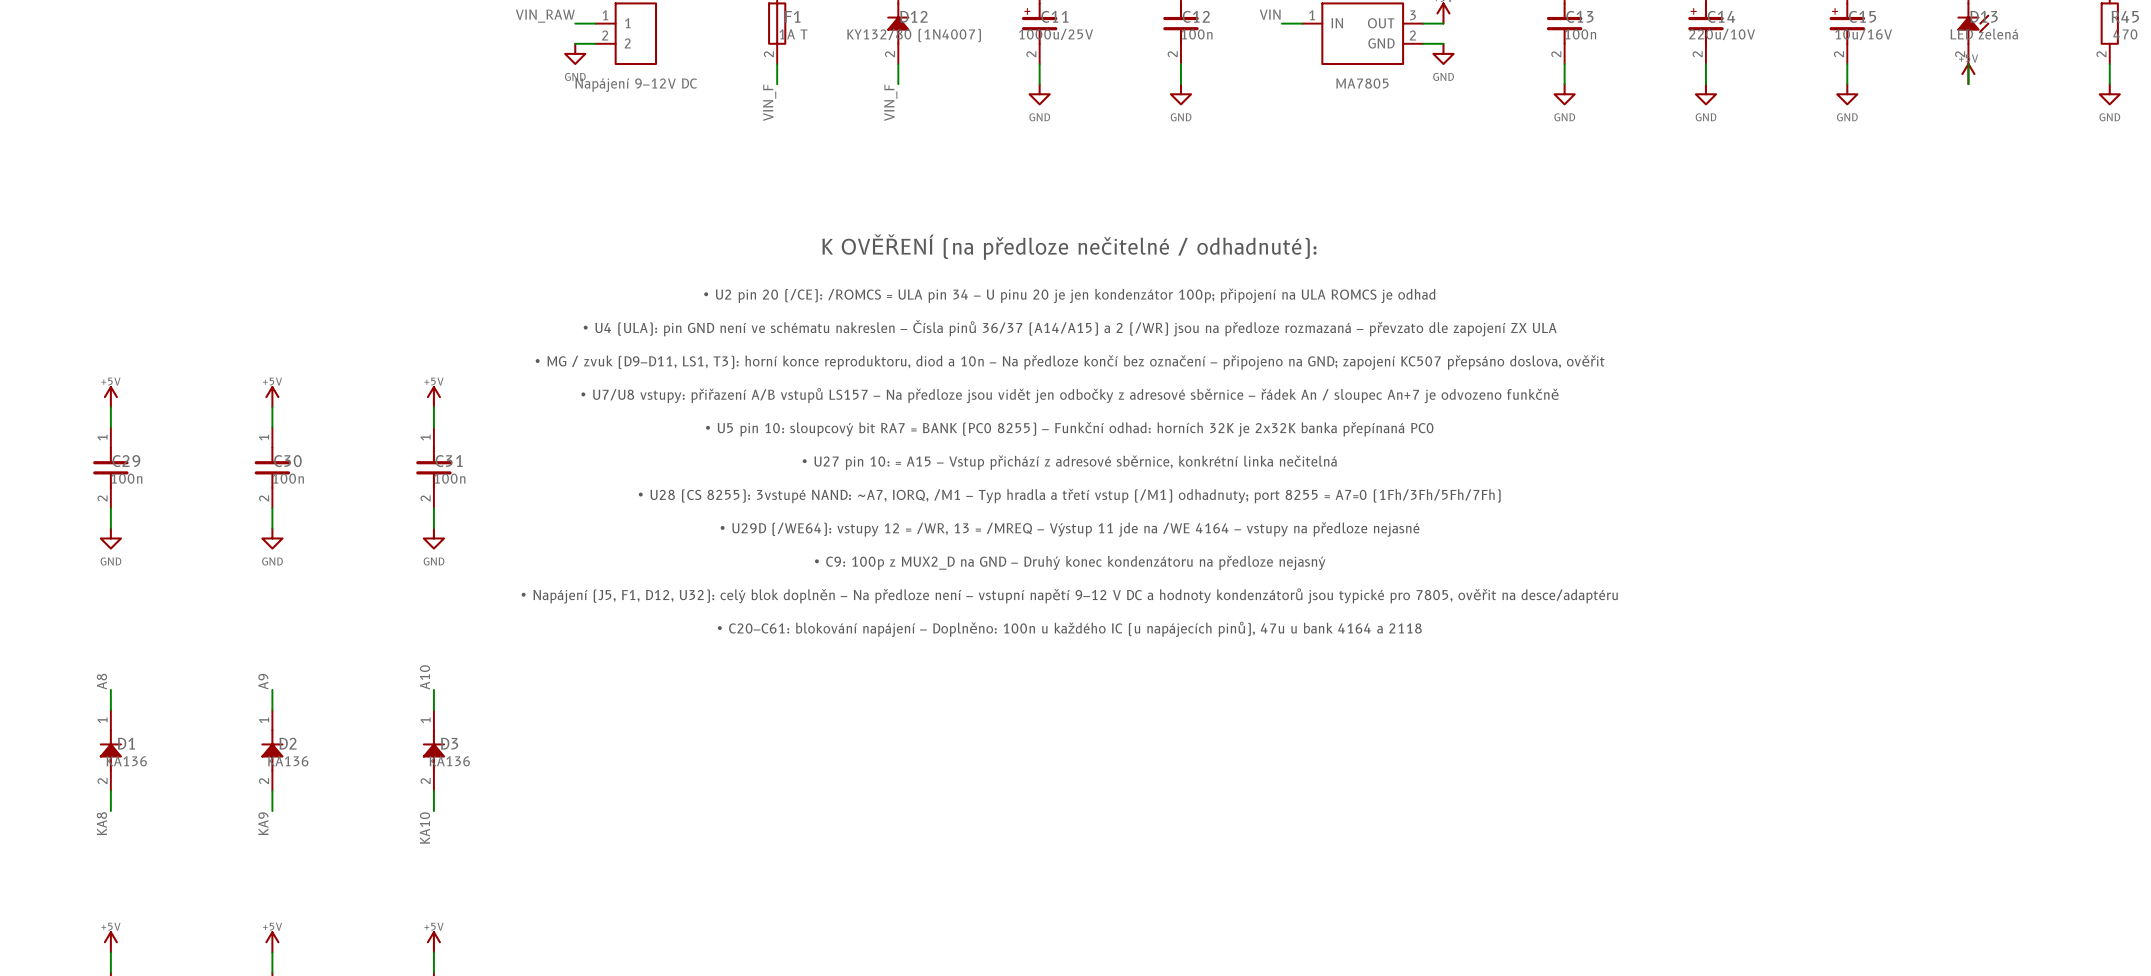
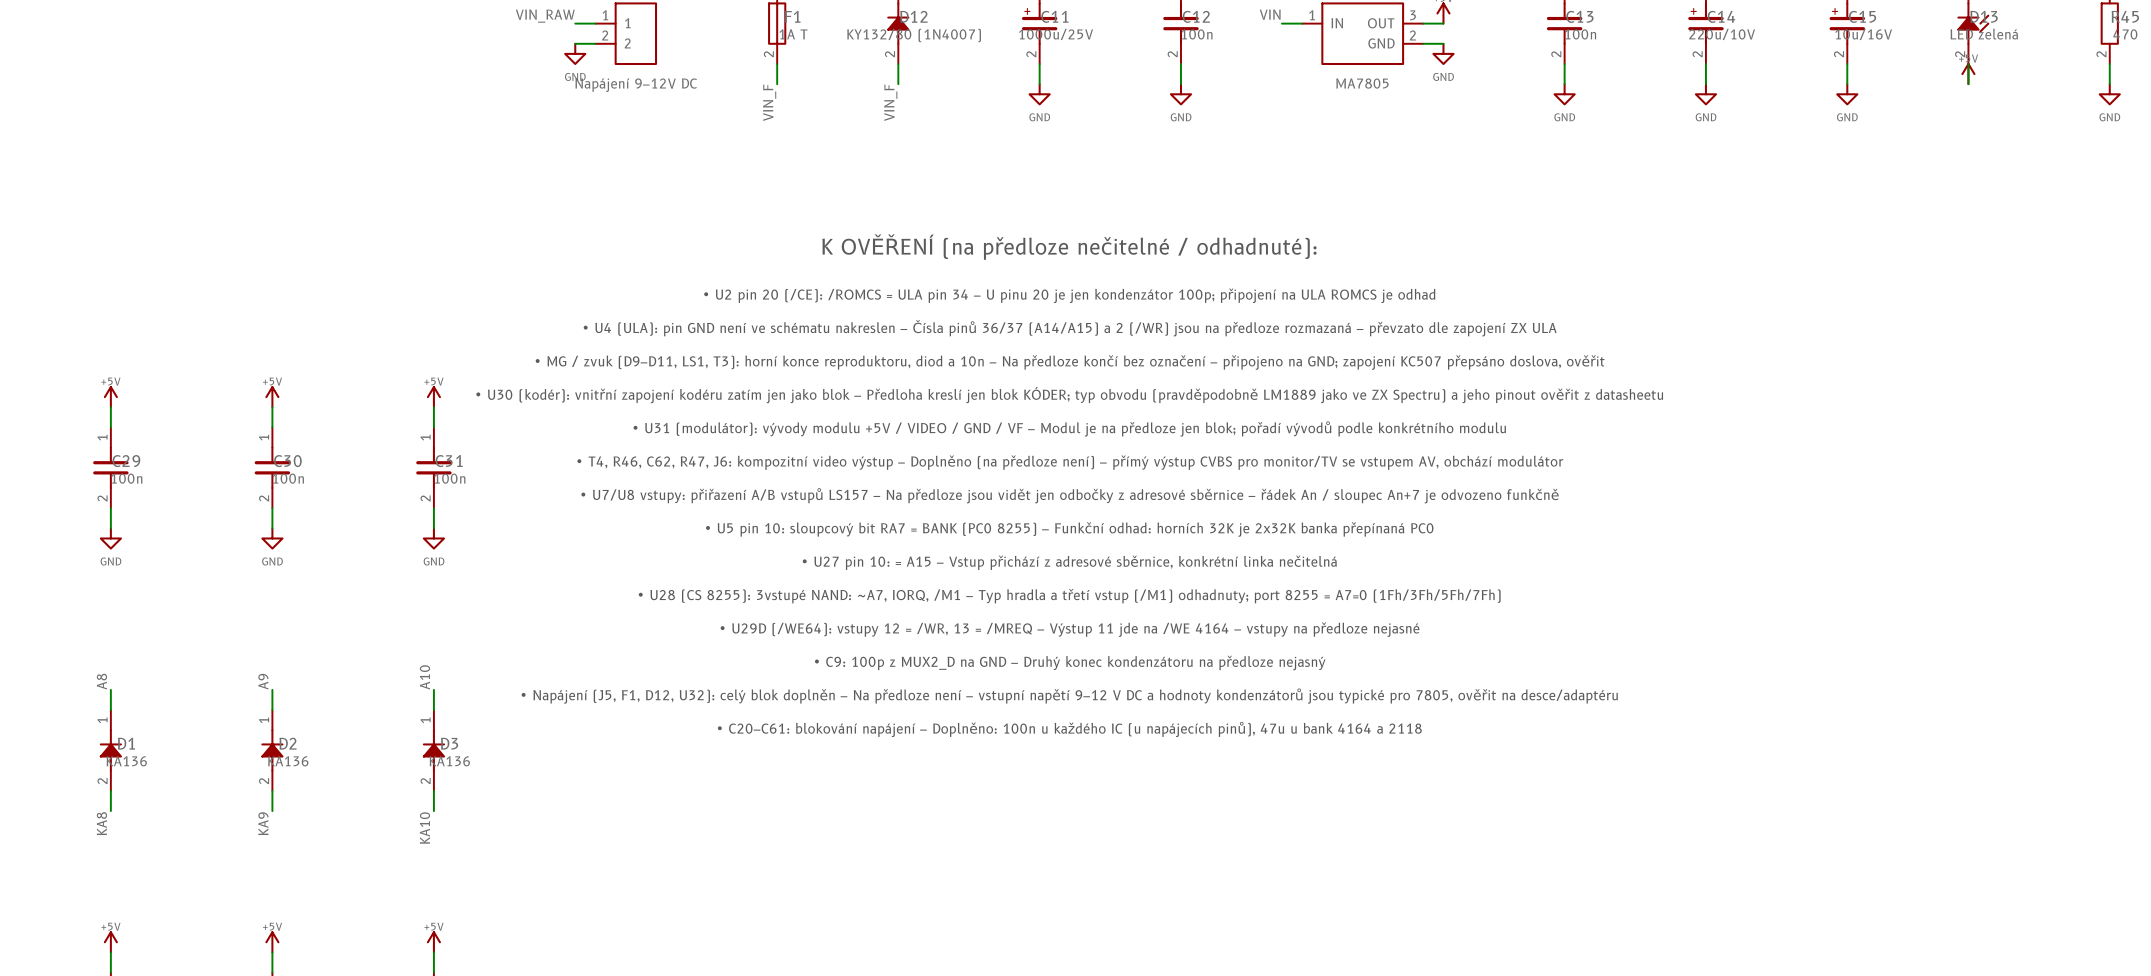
text: • U7/U8 vstupy: přiřazení A/B vstupů LS157 – Na předloze jsou vidět jen odbočky z adresové sběrnice – řádek An / sloupec An+7 je odvozeno funkčně (1070, 395) -> • U30 (kodér): vnitřní zapojení kodéru zatím jen jako blok – Předloha kreslí jen blok KÓDER; typ obvodu (pravděpodobně LM1889 jako ve ZX Spectru) a jeho pinout ověřit z datasheetu (1069, 395)
text: • U5 pin 10: sloupcový bit RA7 = BANK (PC0 8255) – Funkční odhad: horních 32K je 2x32K banka přepínaná PC0 (1069, 429) -> • U31 (modulátor): vývody modulu +5V / VIDEO / GND / VF – Modul je na předloze jen blok; pořadí vývodů podle konkrétního modulu (1069, 428)
text: • U27 pin 10: = A15 – Vstup přichází z adresové sběrnice, konkrétní linka nečitelná (1069, 462) -> • T4, R46, C62, R47, J6: kompozitní video výstup – Doplněno (na předloze není) – přímý výstup CVBS pro monitor/TV se vstupem AV, obchází modulátor (1070, 462)
text: • U28 (CS 8255): 3vstupé NAND: ~A7, IORQ, /M1 – Typ hradla a třetí vstup (/M1) odhadnuty; port 8255 = A7=0 (1Fh/3Fh/5Fh/7Fh) (1069, 496) -> • U7/U8 vstupy: přiřazení A/B vstupů LS157 – Na předloze jsou vidět jen odbočky z adresové sběrnice – řádek An / sloupec An+7 je odvozeno funkčně (1070, 495)
text: • U29D (/WE64): vstupy 12 = /WR, 13 = /MREQ – Výstup 11 jde na /WE 4164 – vstupy na předloze nejasné (1070, 529) -> • U5 pin 10: sloupcový bit RA7 = BANK (PC0 8255) – Funkční odhad: horních 32K je 2x32K banka přepínaná PC0 (1069, 529)
text: • C9: 100p z MUX2_D na GND – Druhý konec kondenzátoru na předloze nejasný (1070, 562) -> • U27 pin 10: = A15 – Vstup přichází z adresové sběrnice, konkrétní linka nečitelná (1069, 562)
text: • Napájení (J5, F1, D12, U32): celý blok doplněn – Na předloze není – vstupní napětí 9–12 V DC a hodnoty kondenzátorů jsou typické pro 7805, ověřit na desce/adaptéru (1069, 595) -> • U28 (CS 8255): 3vstupé NAND: ~A7, IORQ, /M1 – Typ hradla a třetí vstup (/M1) odhadnuty; port 8255 = A7=0 (1Fh/3Fh/5Fh/7Fh) (1069, 596)
text: • C20–C61: blokování napájení – Doplněno: 100n u každého IC (u napájecích pinů), 47u u bank 4164 a 2118 (1069, 629) -> • U29D (/WE64): vstupy 12 = /WR, 13 = /MREQ – Výstup 11 jde na /WE 4164 – vstupy na předloze nejasné (1070, 629)
text: none -> • C9: 100p z MUX2_D na GND – Druhý konec kondenzátoru na předloze nejasný (1070, 663)
text: none -> • Napájení (J5, F1, D12, U32): celý blok doplněn – Na předloze není – vstupní napětí 9–12 V DC a hodnoty kondenzátorů jsou typické pro 7805, ověřit na desce/adaptéru (1069, 696)
text: none -> • C20–C61: blokování napájení – Doplněno: 100n u každého IC (u napájecích pinů), 47u u bank 4164 a 2118 (1069, 729)

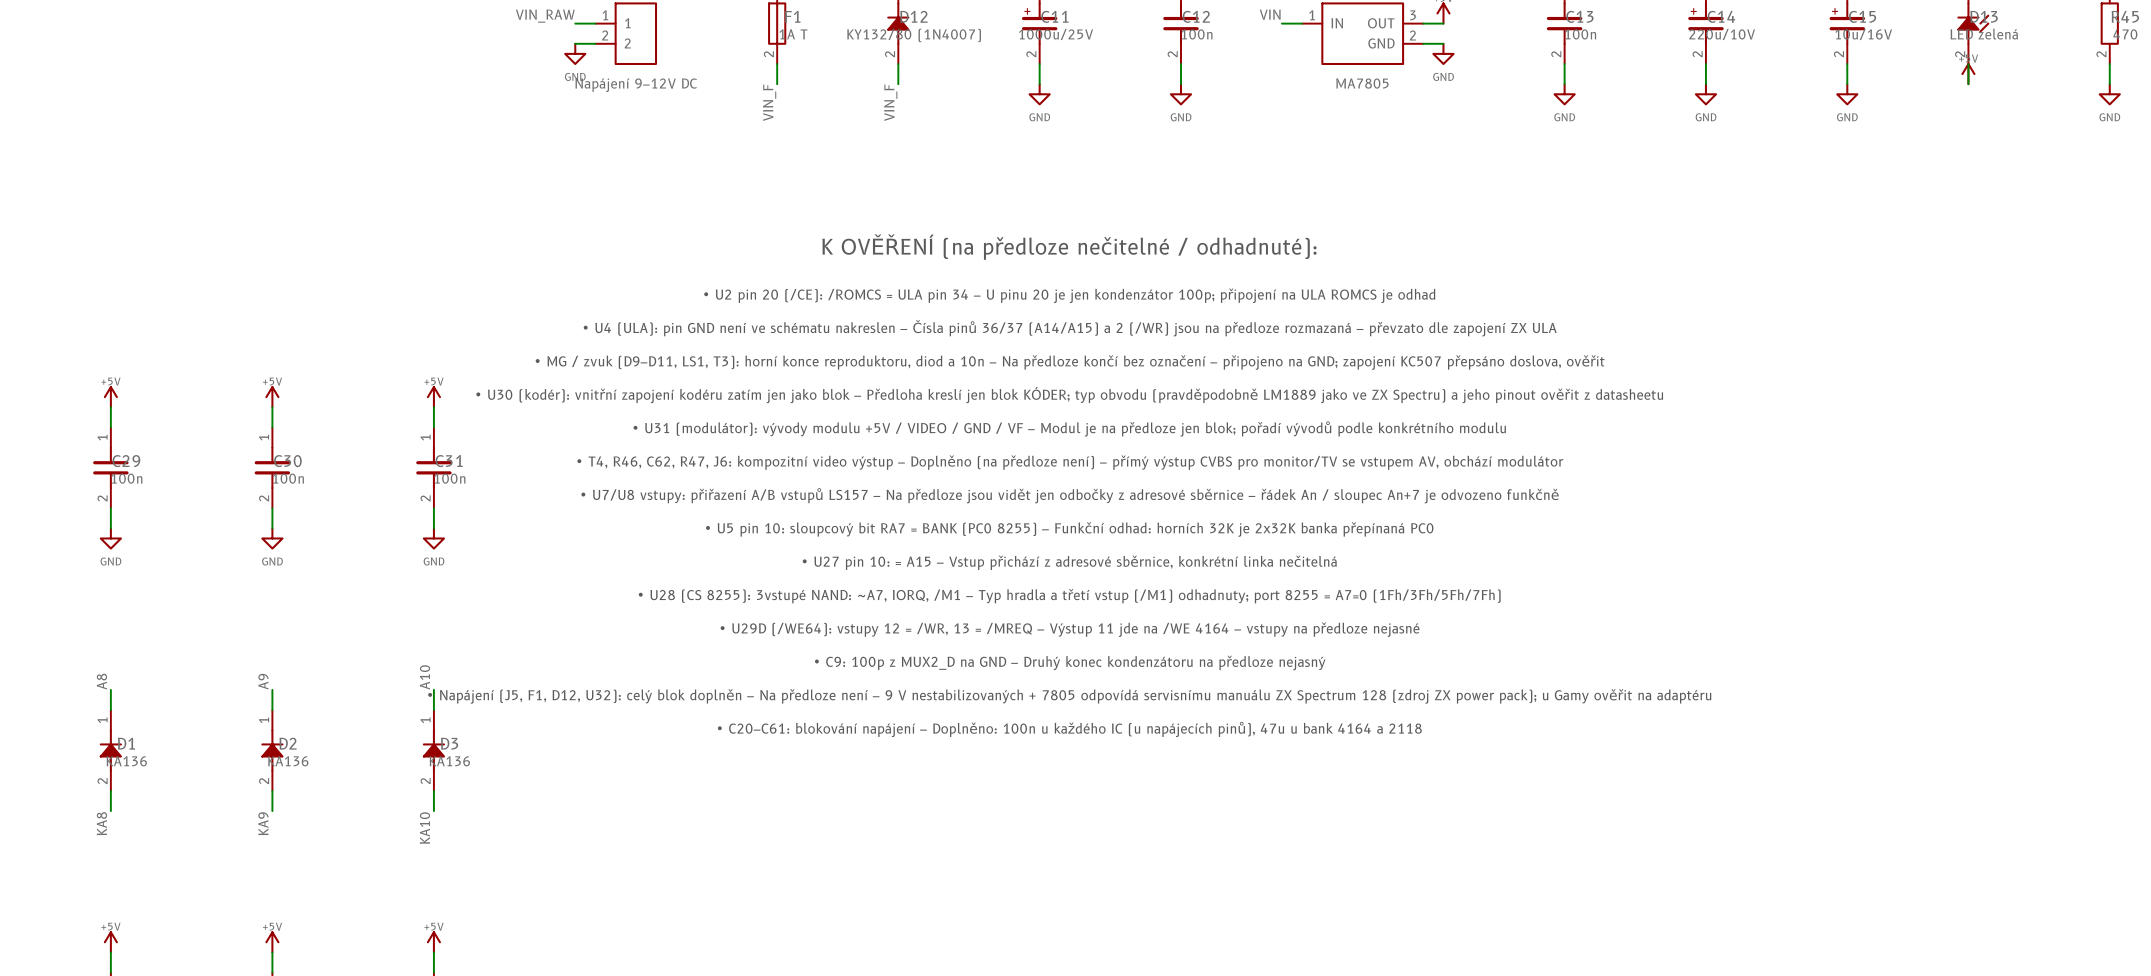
text: • Napájení (J5, F1, D12, U32): celý blok doplněn – Na předloze není – vstupní napětí 9–12 V DC a hodnoty kondenzátorů jsou typické pro 7805, ověřit na desce/adaptéru (1069, 696) -> • Napájení (J5, F1, D12, U32): celý blok doplněn – Na předloze není – 9 V nestabilizovaných + 7805 odpovídá servisnímu manuálu ZX Spectrum 128 (zdroj ZX power pack); u Gamy ověřit na adaptéru (1069, 696)

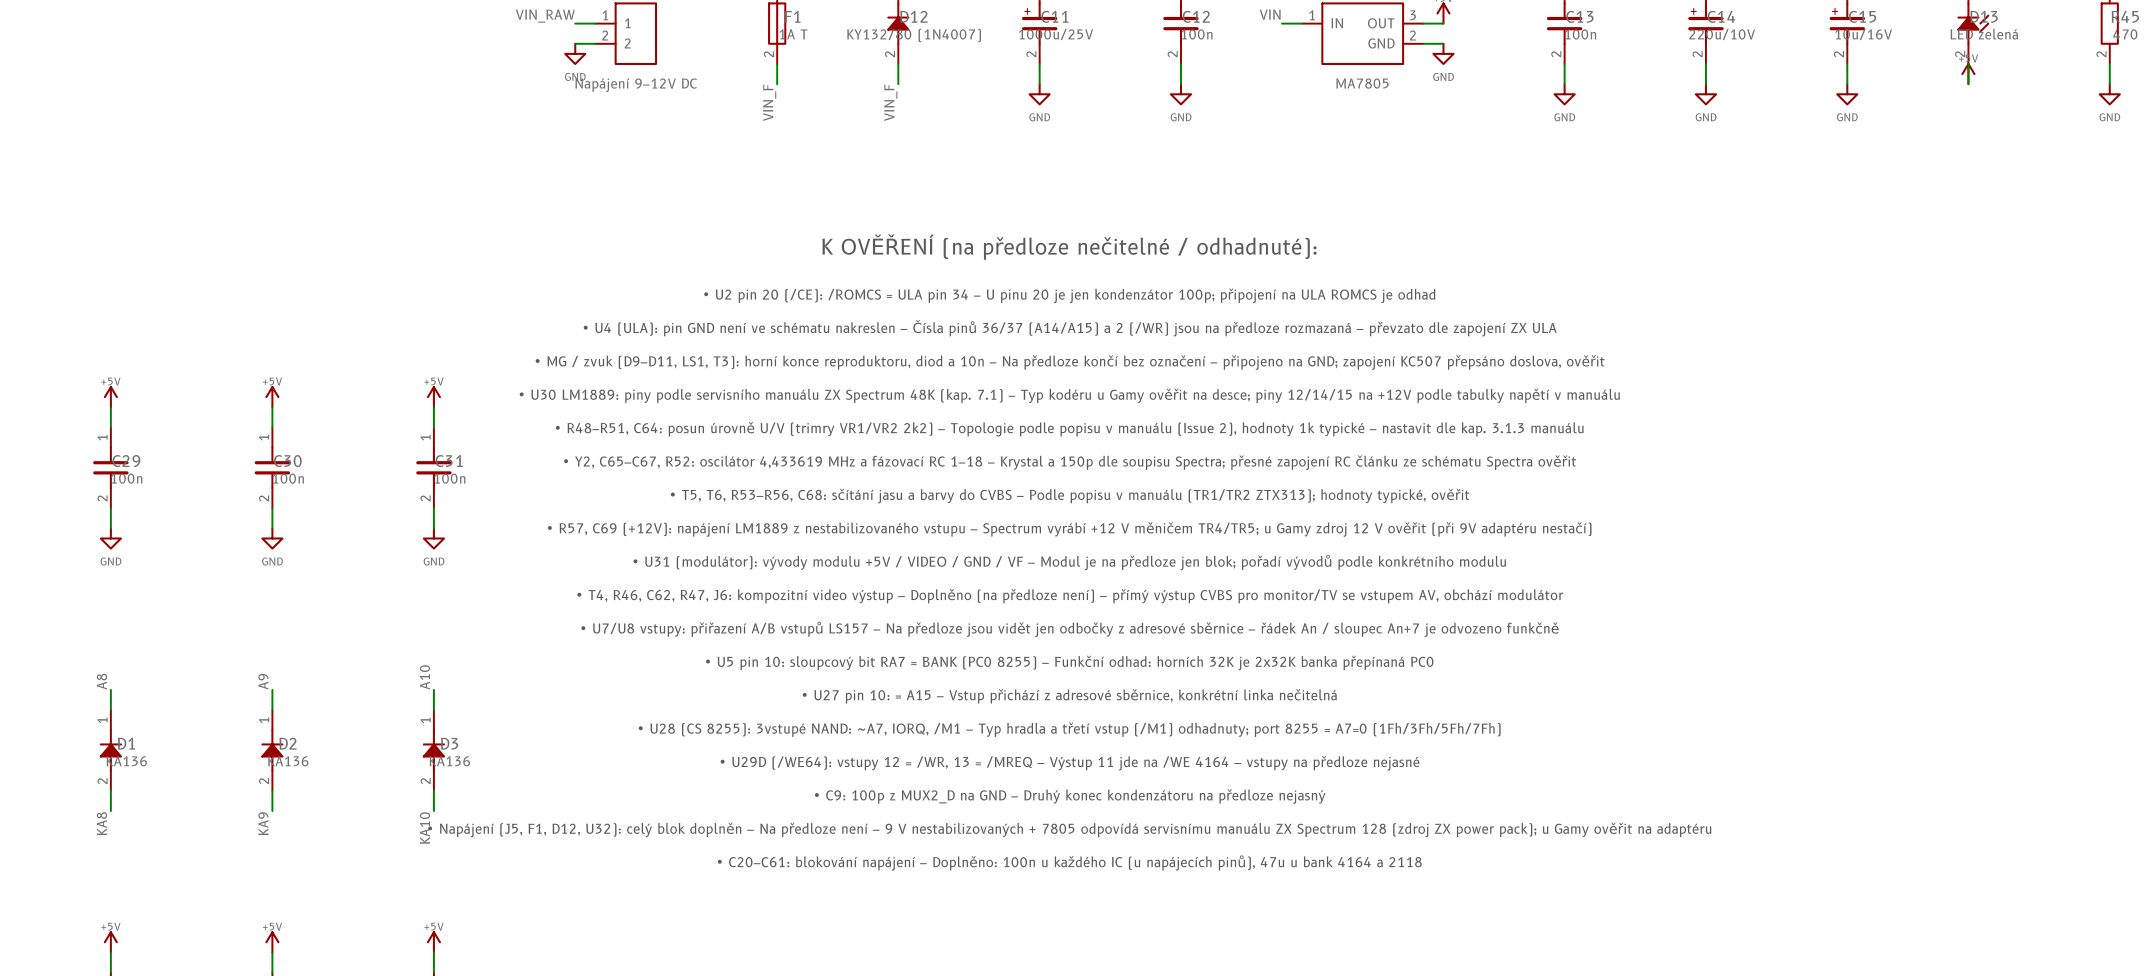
text: • U30 (kodér): vnitřní zapojení kodéru zatím jen jako blok – Předloha kreslí jen blok KÓDER; typ obvodu (pravděpodobně LM1889 jako ve ZX Spectru) a jeho pinout ověřit z datasheetu (1069, 395) -> • U30 LM1889: piny podle servisního manuálu ZX Spectrum 48K (kap. 7.1) – Typ kodéru u Gamy ověřit na desce; piny 12/14/15 na +12V podle tabulky napětí v manuálu (1069, 395)
text: • U31 (modulátor): vývody modulu +5V / VIDEO / GND / VF – Modul je na předloze jen blok; pořadí vývodů podle konkrétního modulu (1069, 428) -> • R48–R51, C64: posun úrovně U/V (trimry VR1/VR2 2k2) – Topologie podle popisu v manuálu (Issue 2), hodnoty 1k typické – nastavit dle kap. 3.1.3 manuálu (1069, 429)
text: • T4, R46, C62, R47, J6: kompozitní video výstup – Doplněno (na předloze není) – přímý výstup CVBS pro monitor/TV se vstupem AV, obchází modulátor (1070, 462) -> • Y2, C65–C67, R52: oscilátor 4,433619 MHz a fázovací RC 1–18 – Krystal a 150p dle soupisu Spectra; přesné zapojení RC článku ze schématu Spectra ověřit (1070, 462)
text: • U7/U8 vstupy: přiřazení A/B vstupů LS157 – Na předloze jsou vidět jen odbočky z adresové sběrnice – řádek An / sloupec An+7 je odvozeno funkčně (1070, 495) -> • T5, T6, R53–R56, C68: sčítání jasu a barvy do CVBS – Podle popisu v manuálu (TR1/TR2 ZTX313); hodnoty typické, ověřit (1070, 496)
text: • U5 pin 10: sloupcový bit RA7 = BANK (PC0 8255) – Funkční odhad: horních 32K je 2x32K banka přepínaná PC0 (1069, 529) -> • R57, C69 (+12V): napájení LM1889 z nestabilizovaného vstupu – Spectrum vyrábí +12 V měničem TR4/TR5; u Gamy zdroj 12 V ověřit (při 9V adaptéru nestačí) (1069, 529)
text: • U27 pin 10: = A15 – Vstup přichází z adresové sběrnice, konkrétní linka nečitelná (1069, 562) -> • U31 (modulátor): vývody modulu +5V / VIDEO / GND / VF – Modul je na předloze jen blok; pořadí vývodů podle konkrétního modulu (1069, 562)
text: • U28 (CS 8255): 3vstupé NAND: ~A7, IORQ, /M1 – Typ hradla a třetí vstup (/M1) odhadnuty; port 8255 = A7=0 (1Fh/3Fh/5Fh/7Fh) (1069, 596) -> • T4, R46, C62, R47, J6: kompozitní video výstup – Doplněno (na předloze není) – přímý výstup CVBS pro monitor/TV se vstupem AV, obchází modulátor (1070, 596)
text: • U29D (/WE64): vstupy 12 = /WR, 13 = /MREQ – Výstup 11 jde na /WE 4164 – vstupy na předloze nejasné (1070, 629) -> • U7/U8 vstupy: přiřazení A/B vstupů LS157 – Na předloze jsou vidět jen odbočky z adresové sběrnice – řádek An / sloupec An+7 je odvozeno funkčně (1070, 629)
text: • C9: 100p z MUX2_D na GND – Druhý konec kondenzátoru na předloze nejasný (1070, 663) -> • U5 pin 10: sloupcový bit RA7 = BANK (PC0 8255) – Funkční odhad: horních 32K je 2x32K banka přepínaná PC0 (1069, 663)
text: • Napájení (J5, F1, D12, U32): celý blok doplněn – Na předloze není – 9 V nestabilizovaných + 7805 odpovídá servisnímu manuálu ZX Spectrum 128 (zdroj ZX power pack); u Gamy ověřit na adaptéru (1069, 696) -> • U27 pin 10: = A15 – Vstup přichází z adresové sběrnice, konkrétní linka nečitelná (1069, 696)
text: • C20–C61: blokování napájení – Doplněno: 100n u každého IC (u napájecích pinů), 47u u bank 4164 a 2118 (1069, 729) -> • U28 (CS 8255): 3vstupé NAND: ~A7, IORQ, /M1 – Typ hradla a třetí vstup (/M1) odhadnuty; port 8255 = A7=0 (1Fh/3Fh/5Fh/7Fh) (1069, 729)
text: none -> • U29D (/WE64): vstupy 12 = /WR, 13 = /MREQ – Výstup 11 jde na /WE 4164 – vstupy na předloze nejasné (1070, 763)
text: none -> • C9: 100p z MUX2_D na GND – Druhý konec kondenzátoru na předloze nejasný (1070, 796)
text: none -> • Napájení (J5, F1, D12, U32): celý blok doplněn – Na předloze není – 9 V nestabilizovaných + 7805 odpovídá servisnímu manuálu ZX Spectrum 128 (zdroj ZX power pack); u Gamy ověřit na adaptéru (1069, 829)
text: none -> • C20–C61: blokování napájení – Doplněno: 100n u každého IC (u napájecích pinů), 47u u bank 4164 a 2118 (1069, 863)

